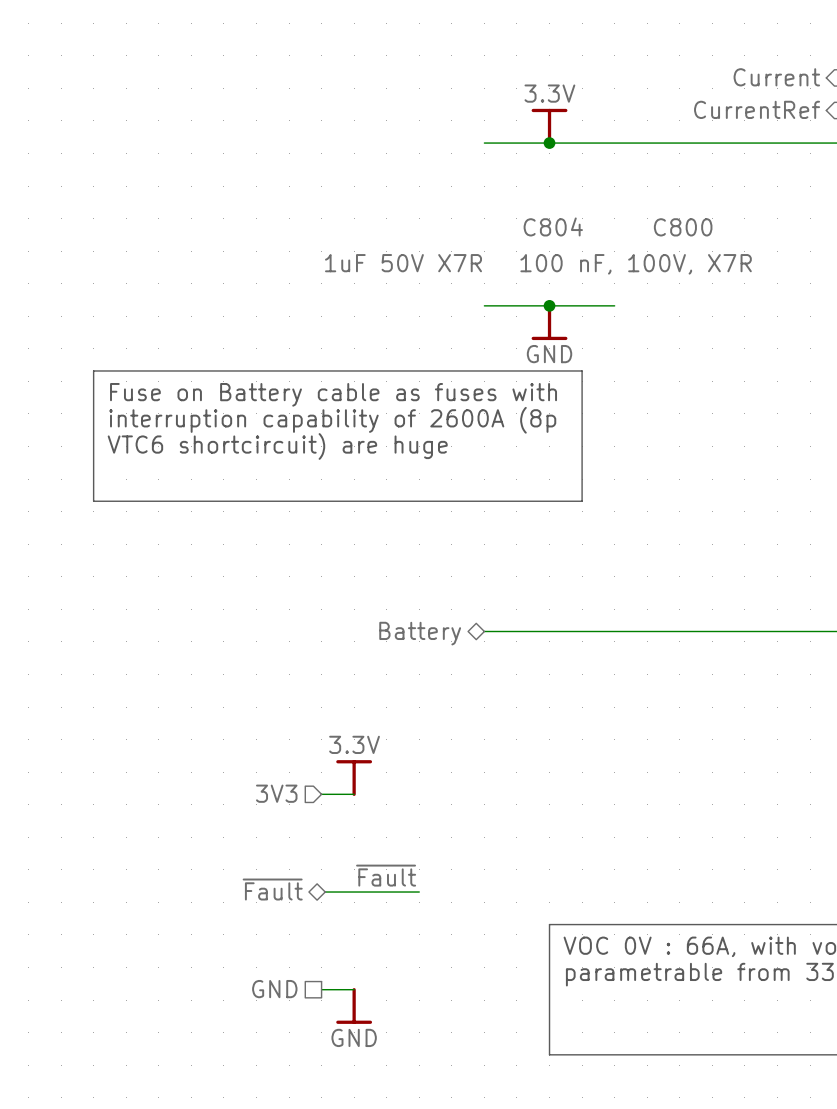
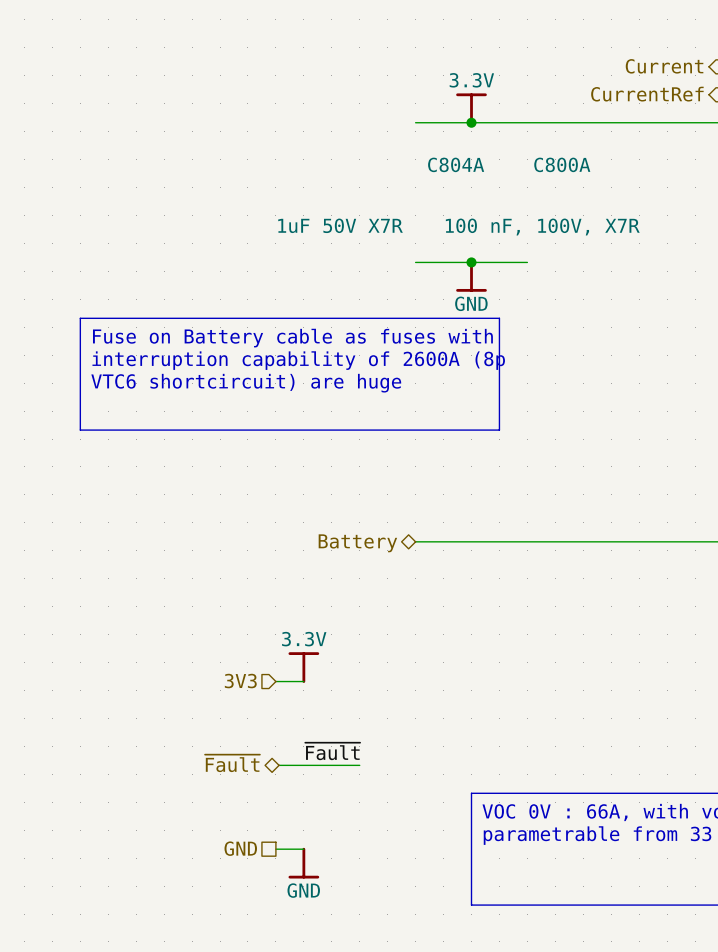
C804A: none -> 1uF 50V X7R (381, 195)
C800A: none -> 100 nF, 100V, X7R (542, 196)
C804: 1uF 50V X7R (453, 244) -> none
C800: 100 nF, 100V, X7R (636, 246) -> none

